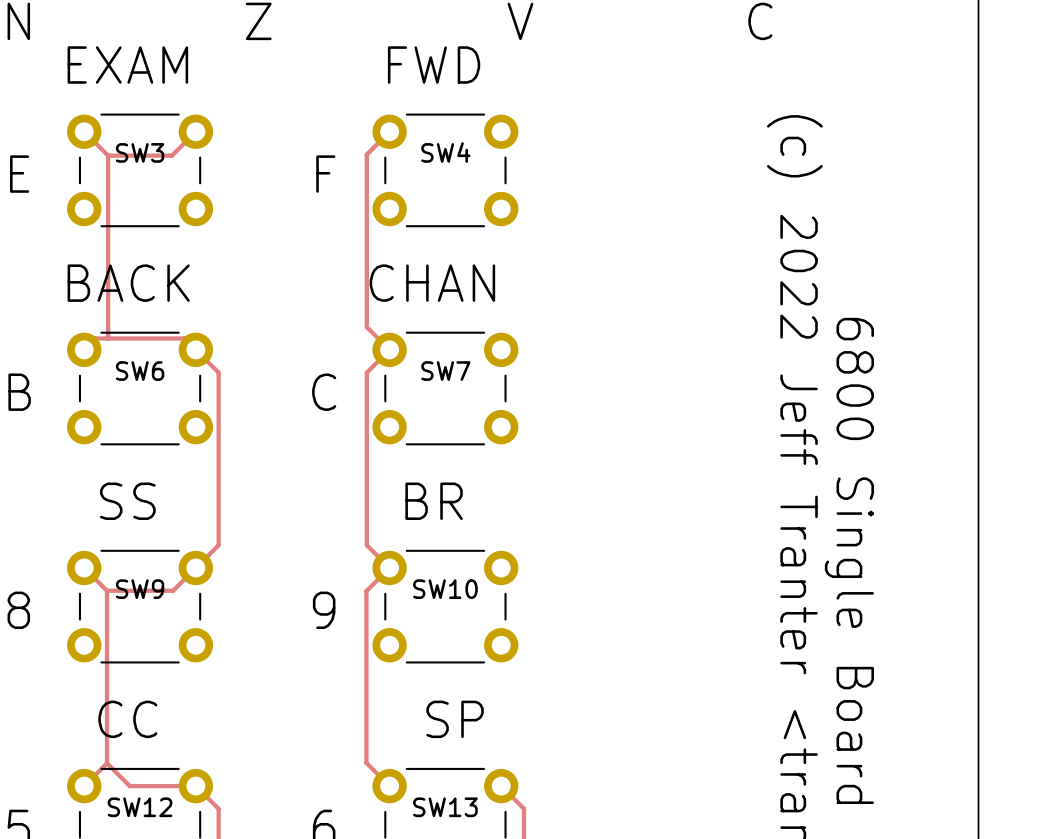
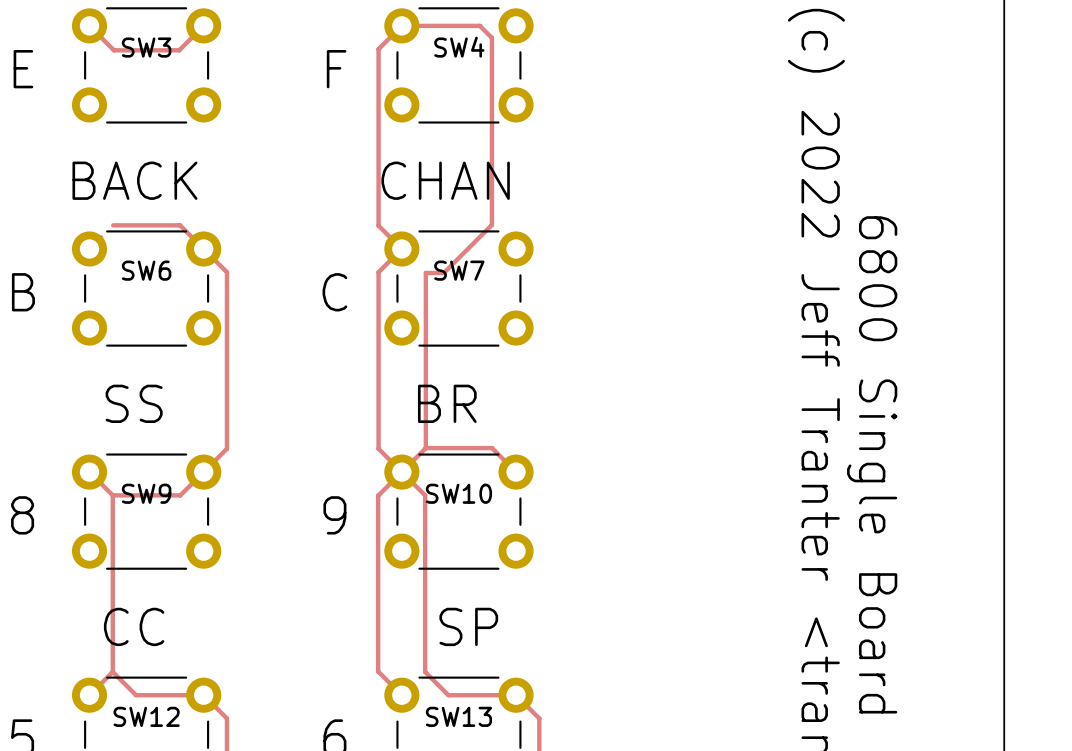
track: none -> (401, 25) (479, 25) (491, 37) (491, 224) (443, 272) (425, 272) (425, 448)
track: (108, 155) (108, 338) -> none
track: (95, 338) (184, 338) -> (113, 225) (180, 225) (192, 237)
track: none -> (425, 448) (401, 472) (425, 495) (425, 671) (448, 695) (516, 695)
track: none -> (425, 448) (492, 448) (516, 472)

